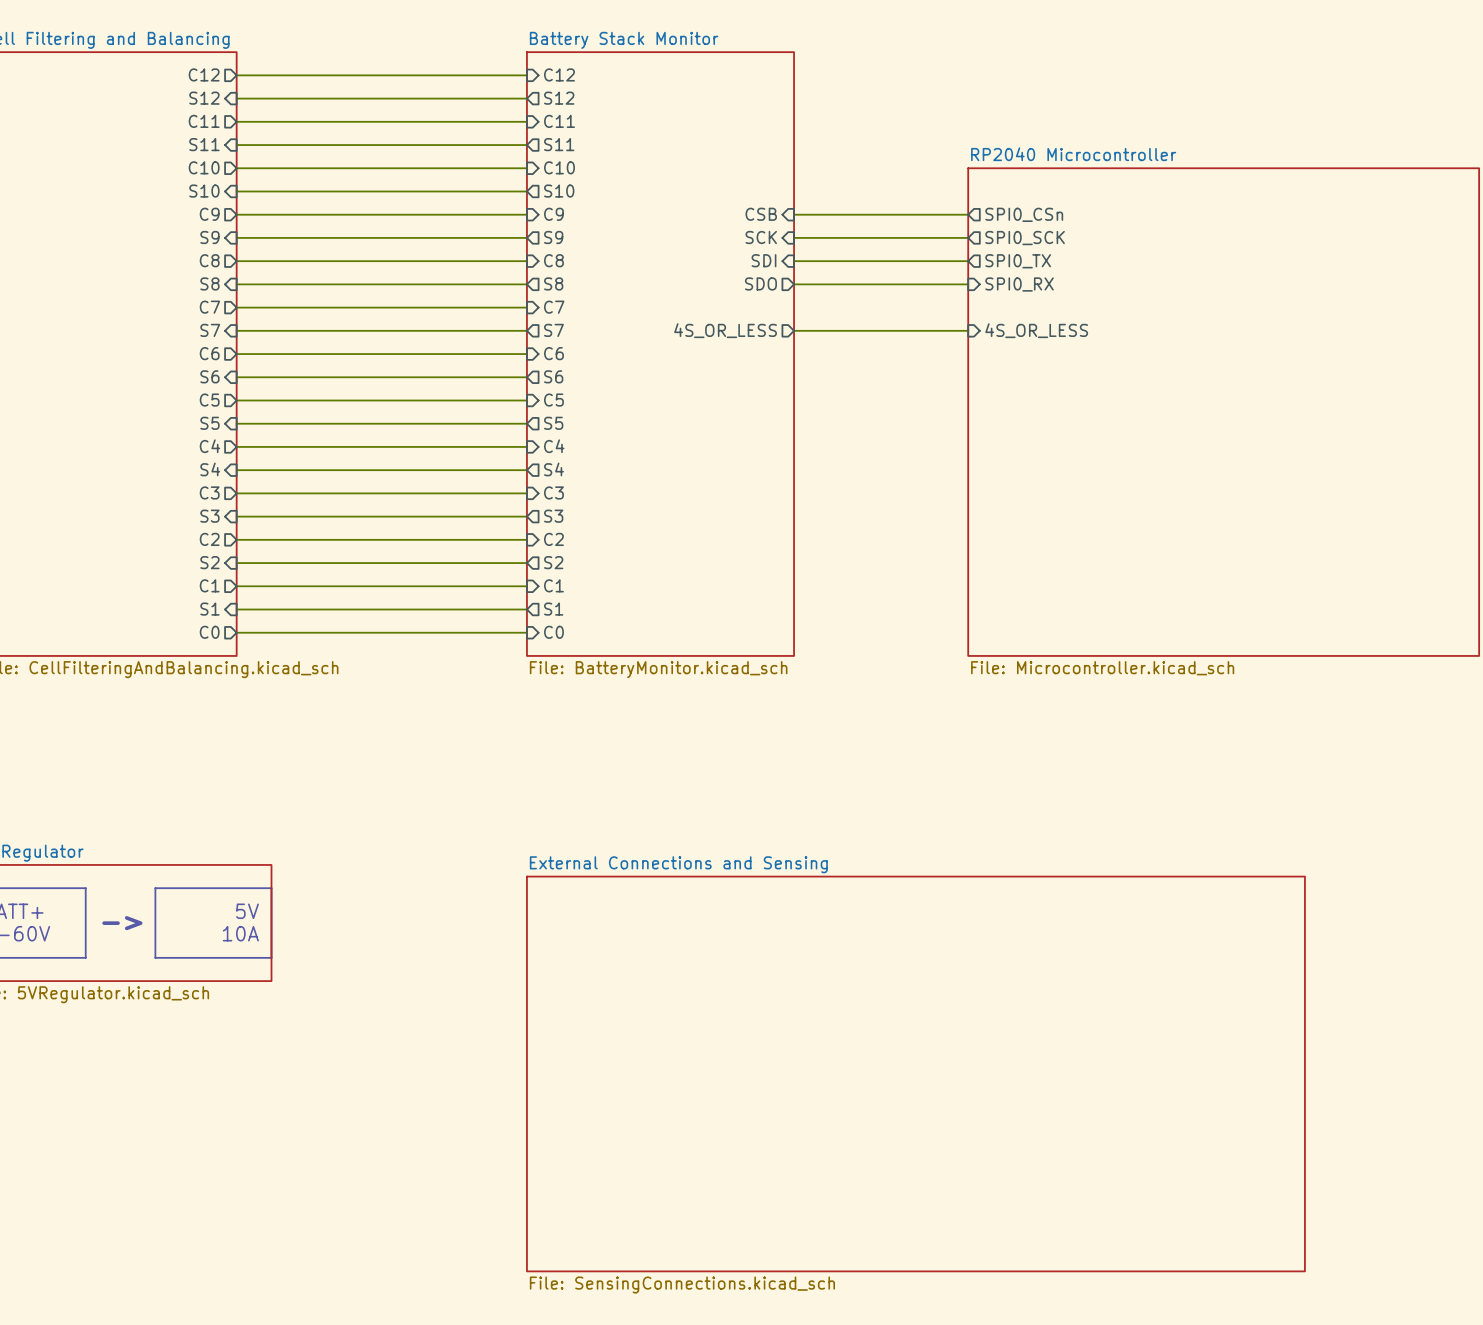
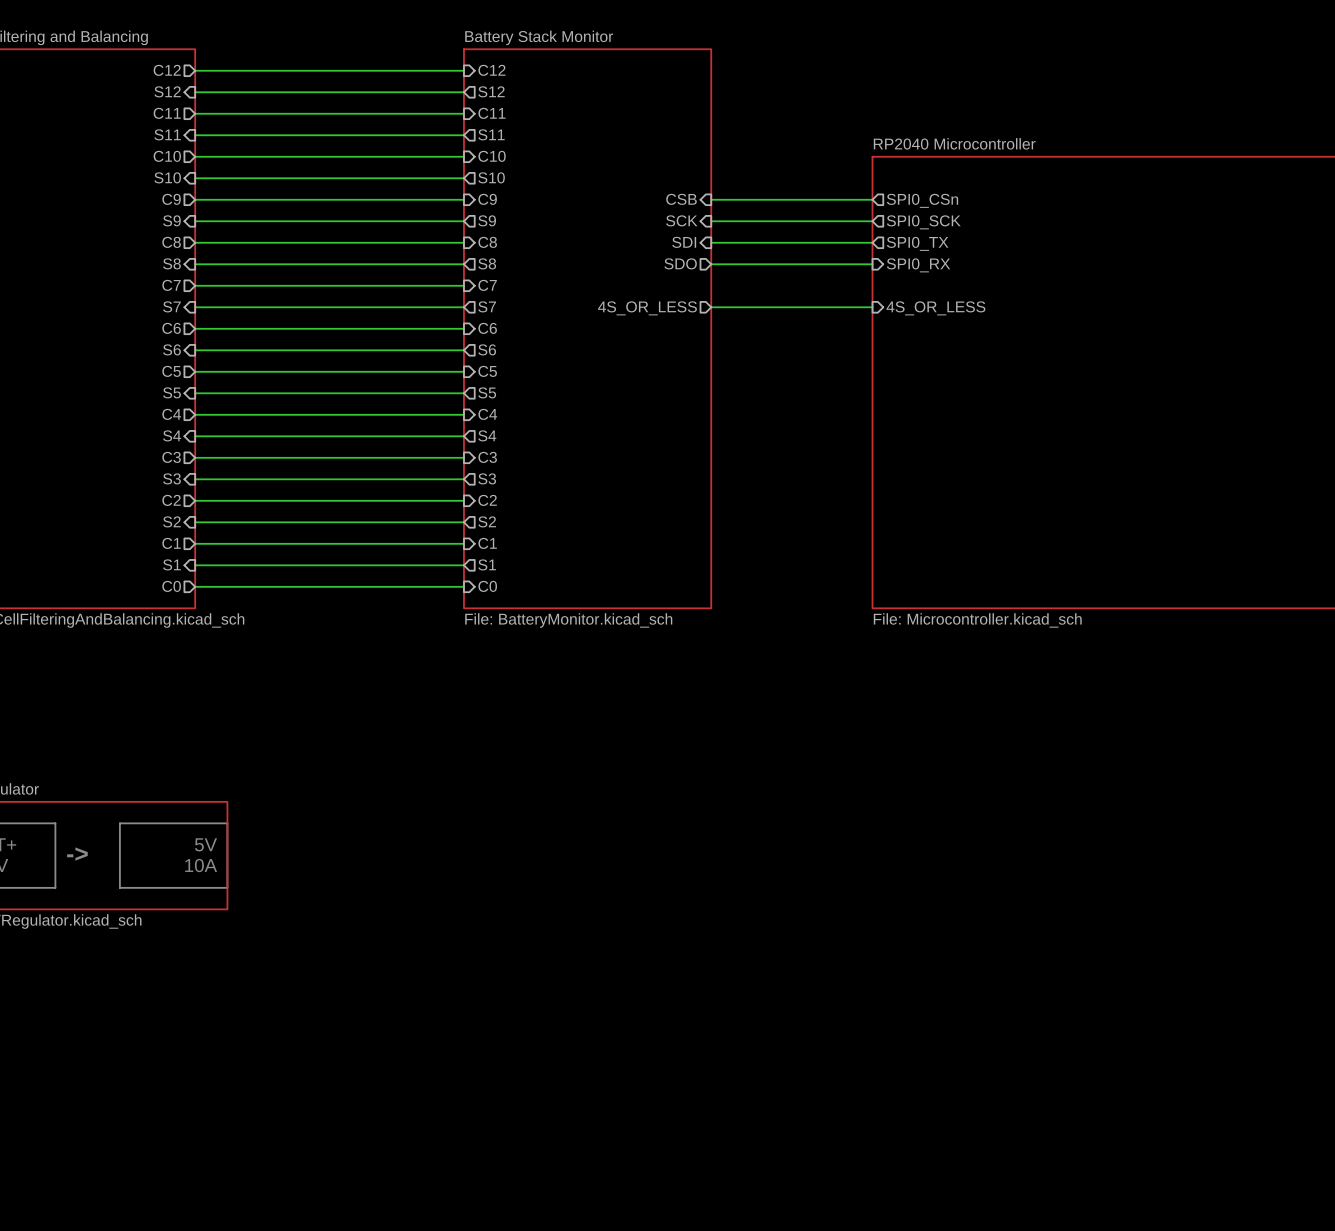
sheet External Connections and Sensing: File: SensingConnections.kicad_sch (915, 1073) -> none

